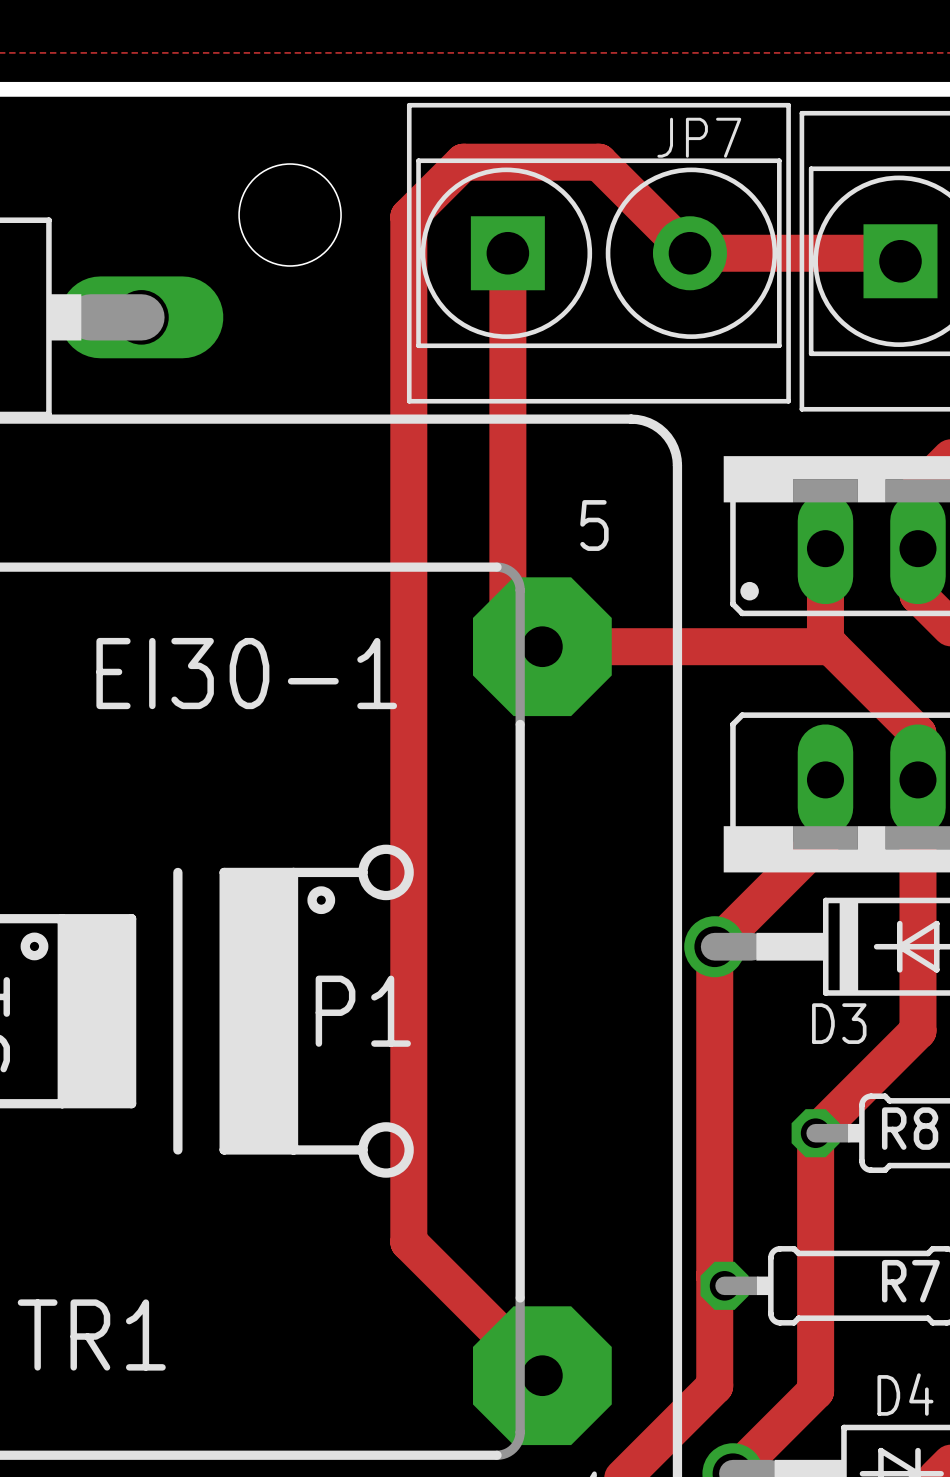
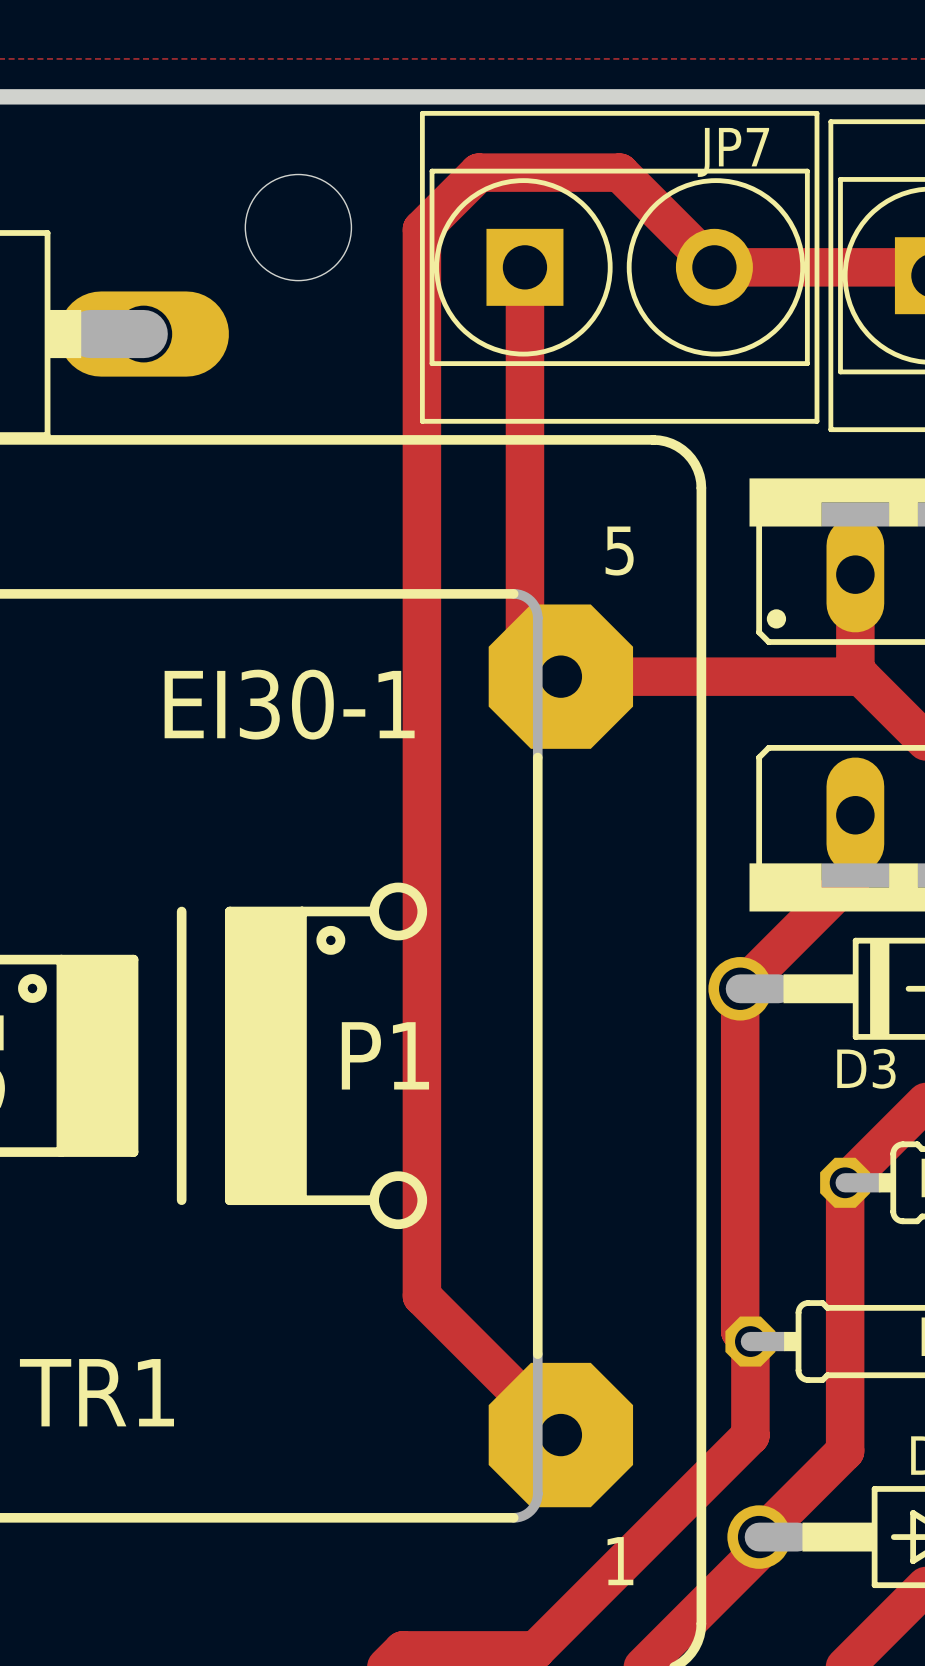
track: (714, 1275) (714, 1385) -> (750, 1341) (750, 1435) (740, 1445)

